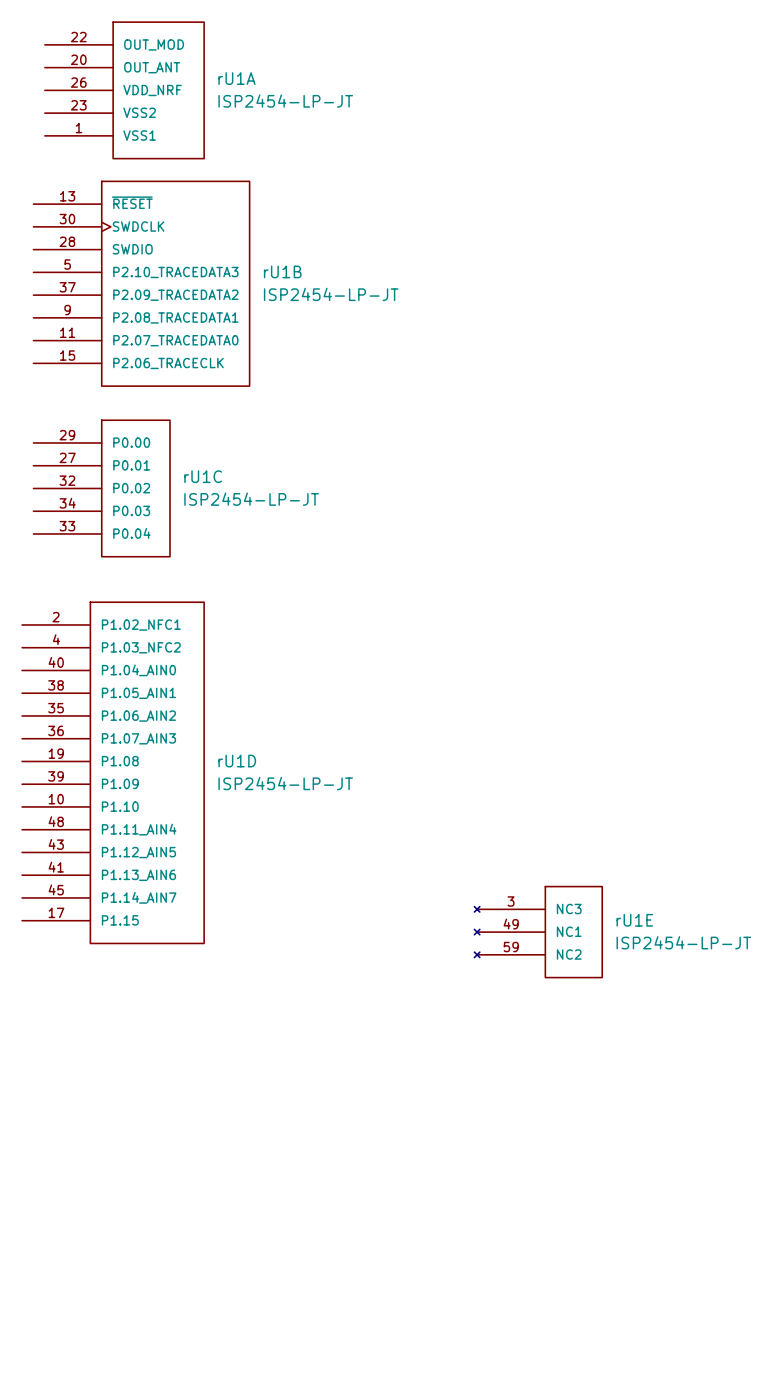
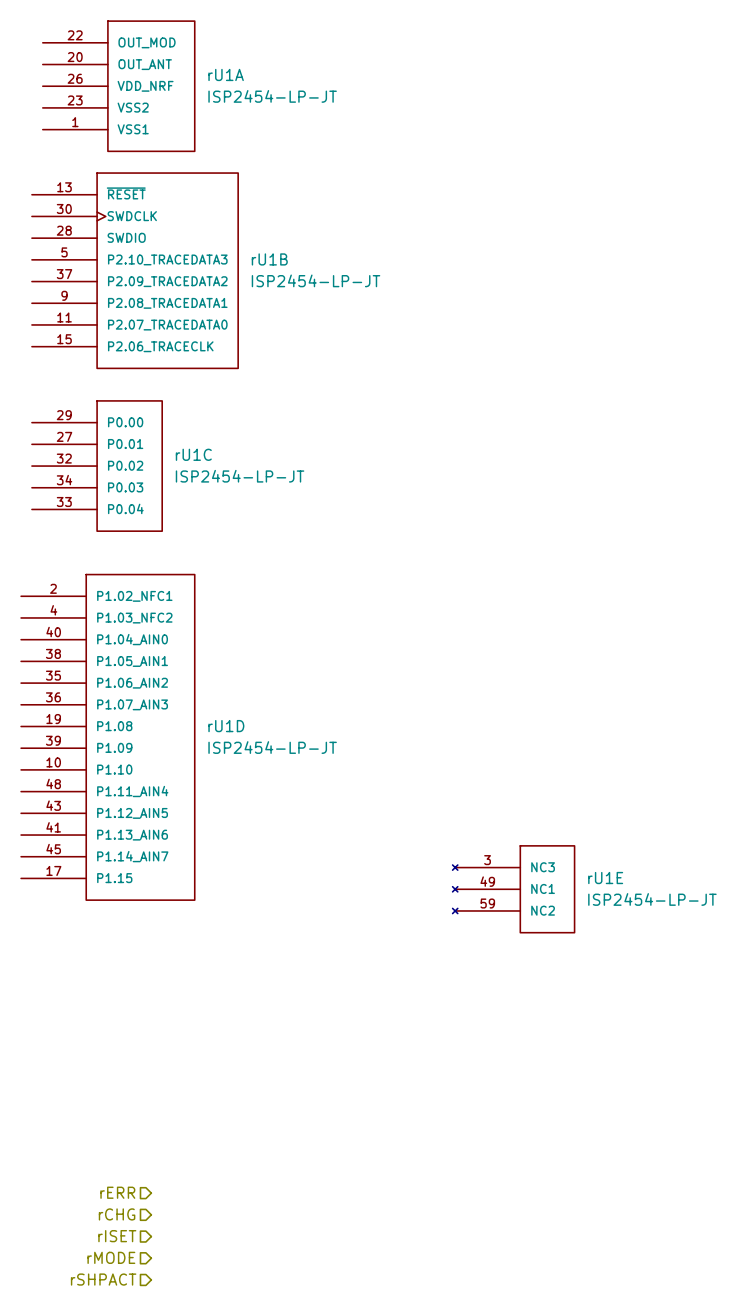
hierarchical label: none -> rERR (117, 1192)
hierarchical label: none -> rCHG (117, 1214)
hierarchical label: none -> rISET (117, 1236)
hierarchical label: none -> rMODE (111, 1257)
hierarchical label: none -> rSHPACT (103, 1279)

